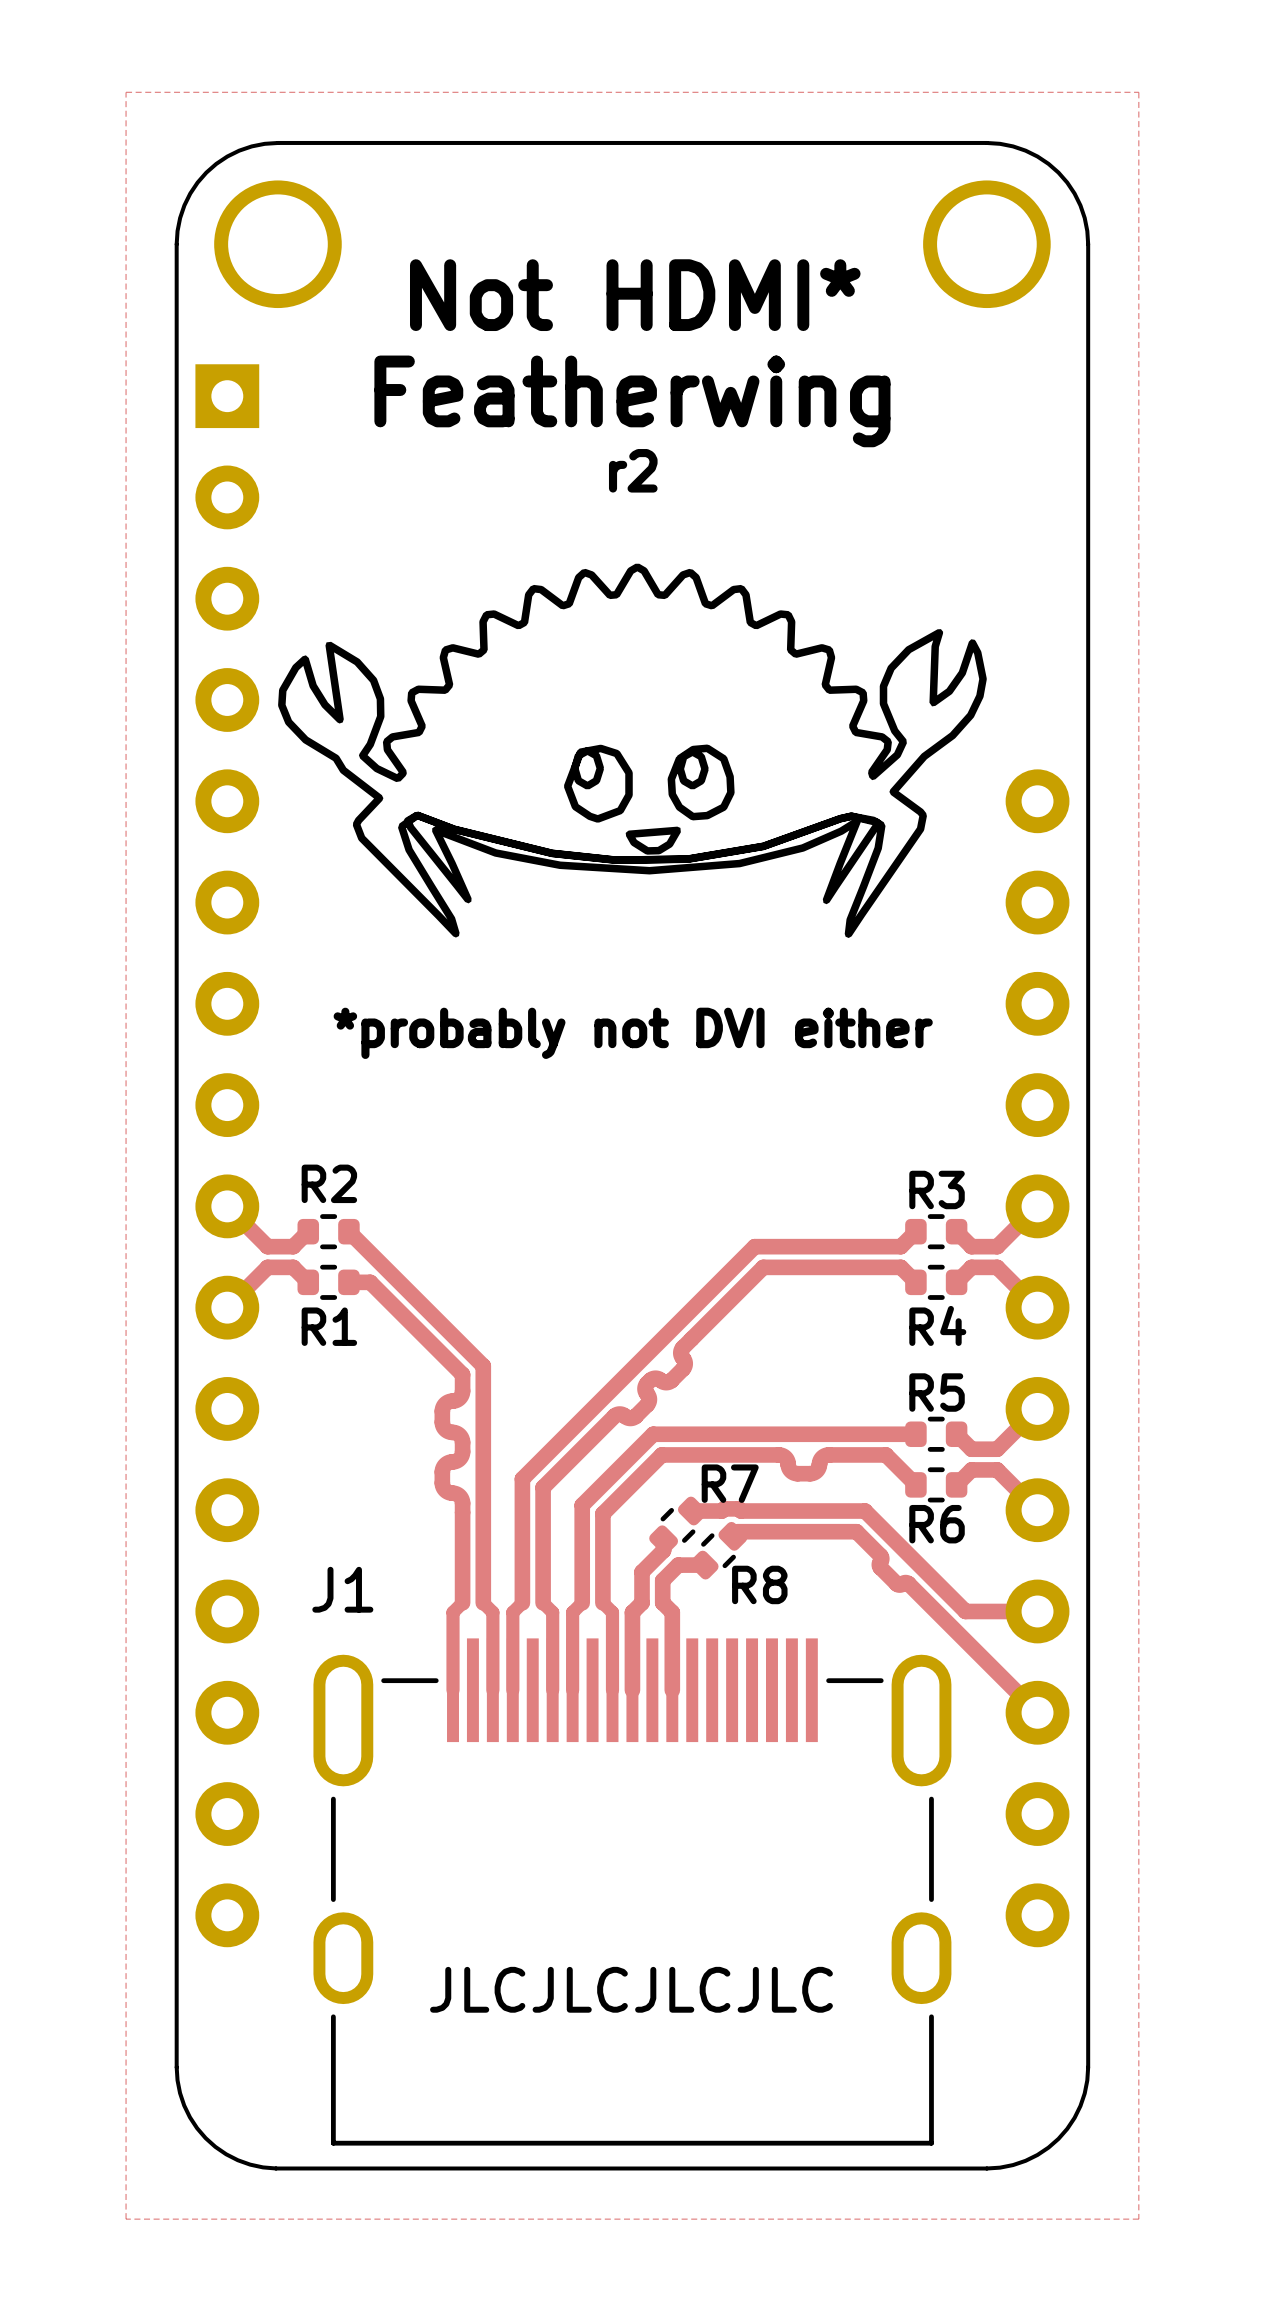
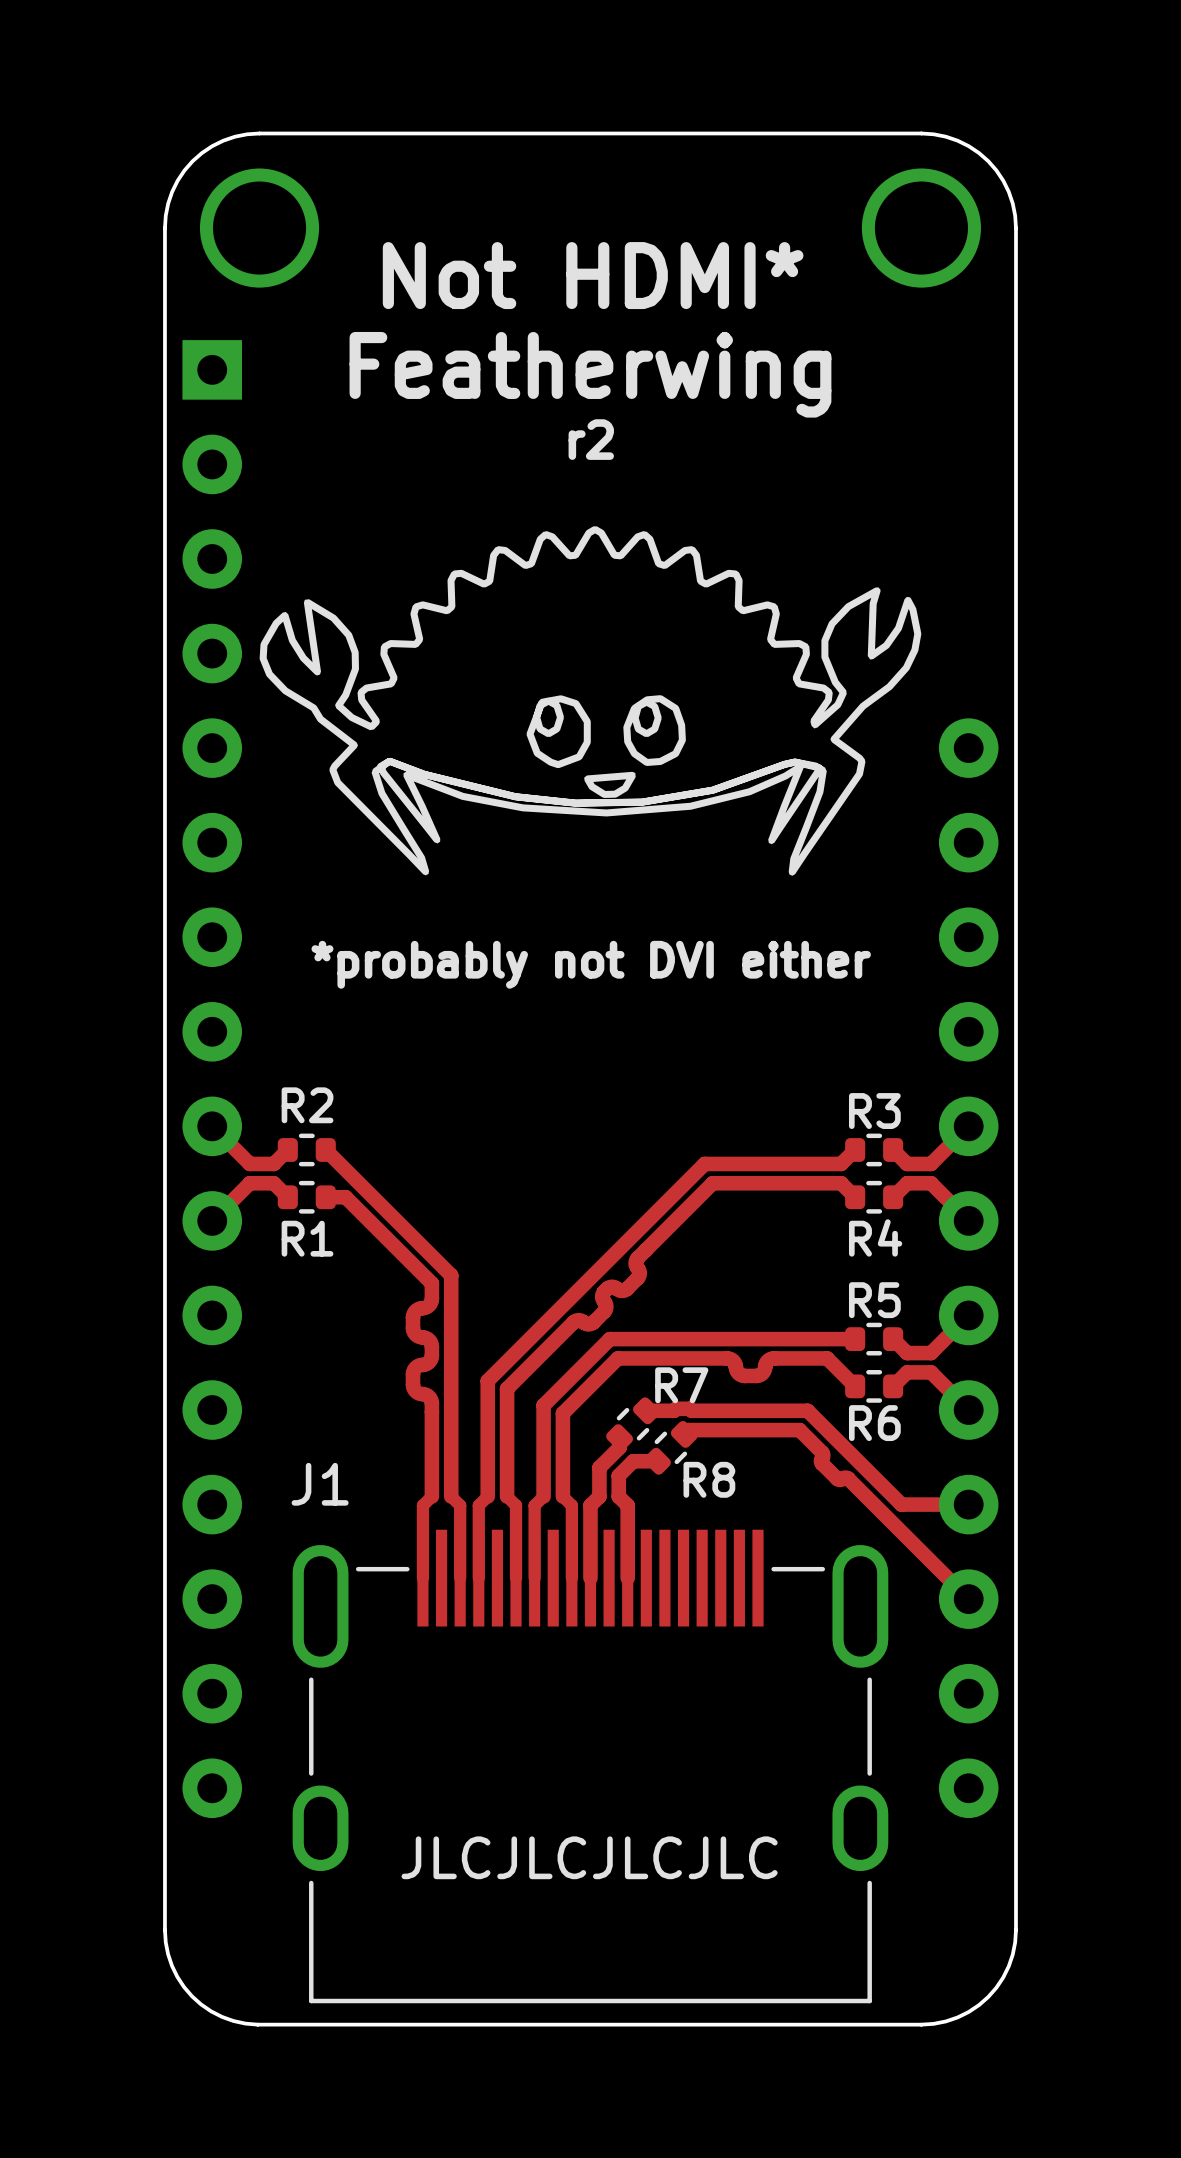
zone outline: (126, 92) (126, 2219) (1138, 2219) (1138, 92) (126, 92) -> none

